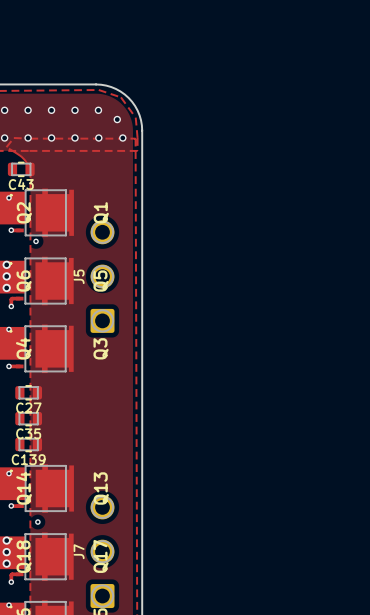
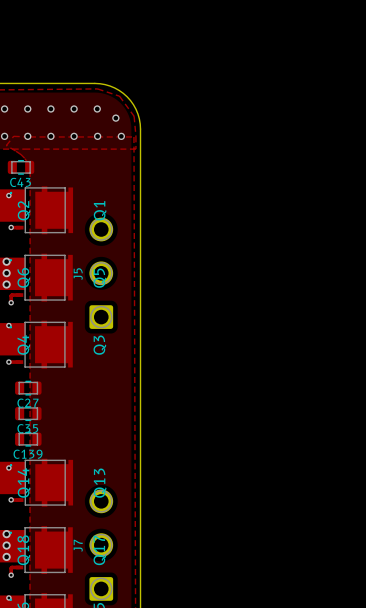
via: (36, 241) -> none
via: (37, 522) -> none

